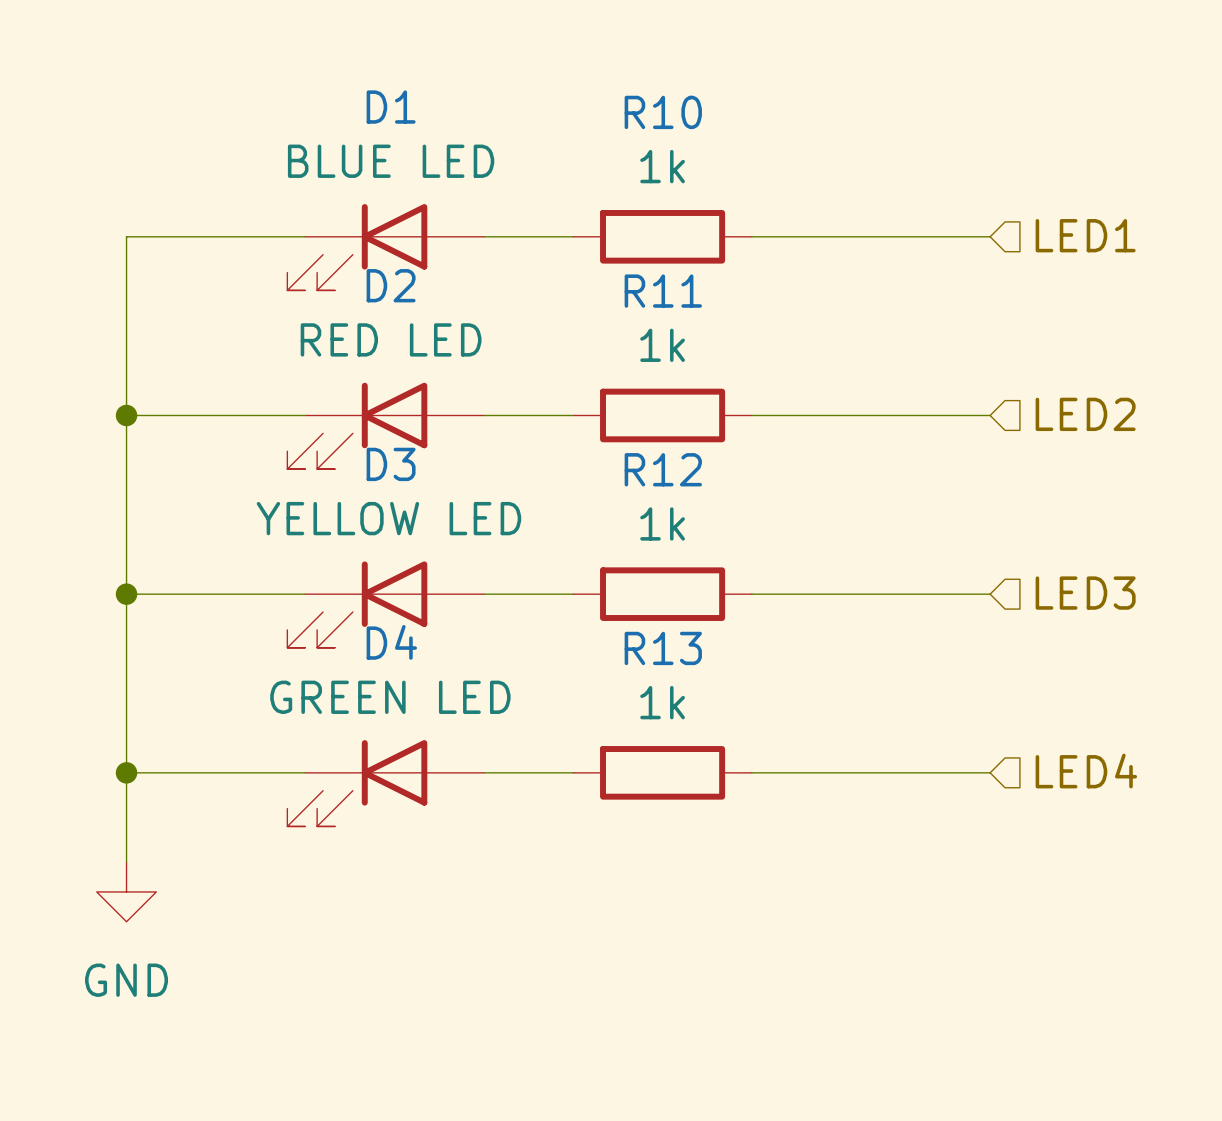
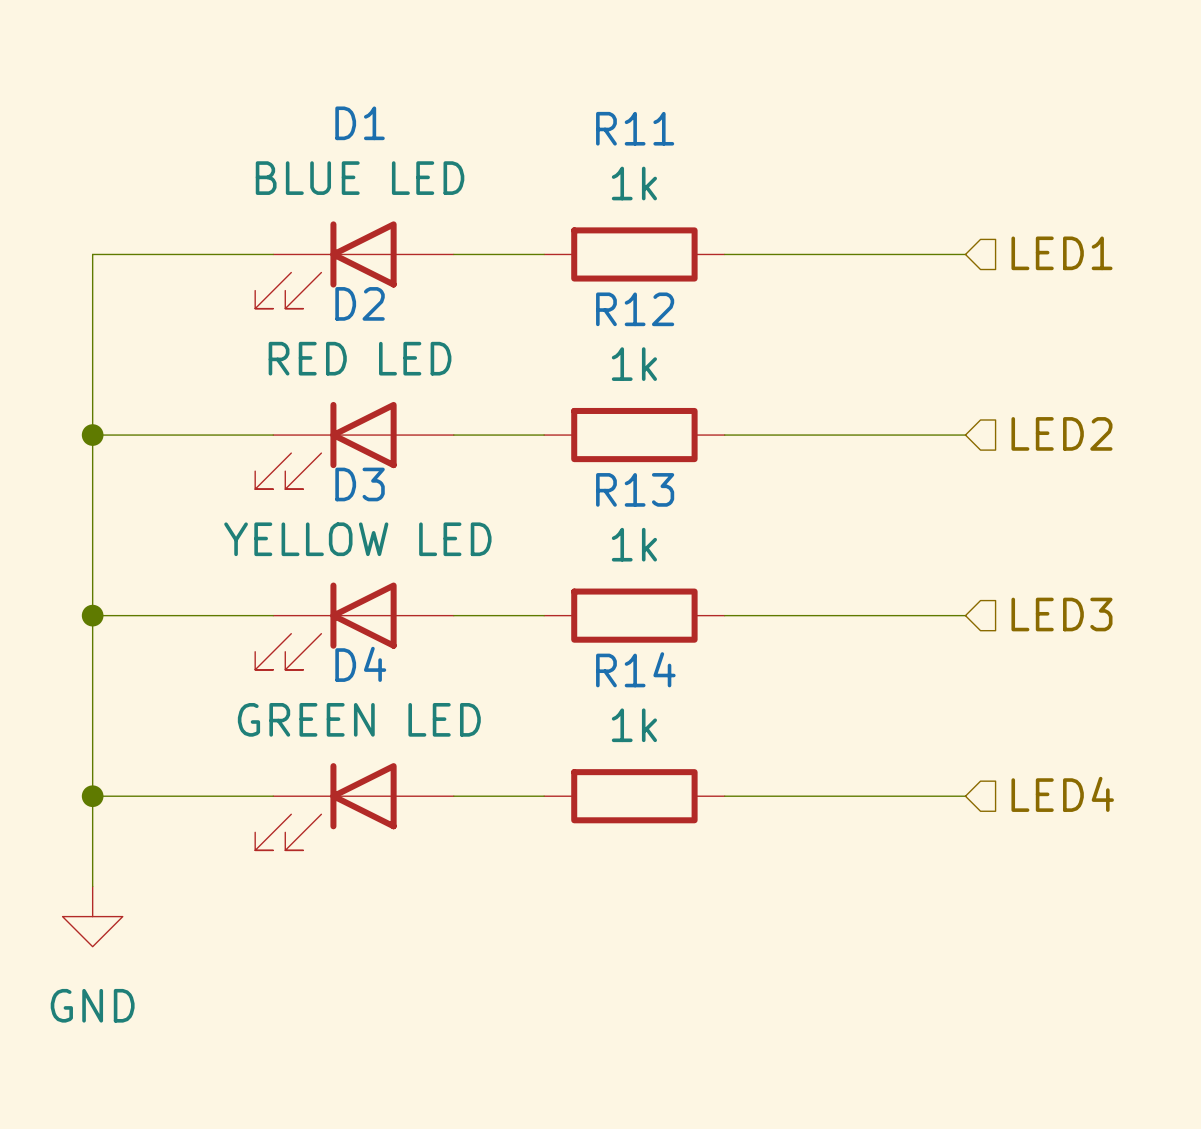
R10 name: R10 (663, 112) -> R11 (635, 128)
R11 name: R11 (663, 291) -> R12 (635, 309)
R12 name: R12 (663, 469) -> R13 (635, 489)
R13 name: R13 (663, 648) -> R14 (635, 669)

